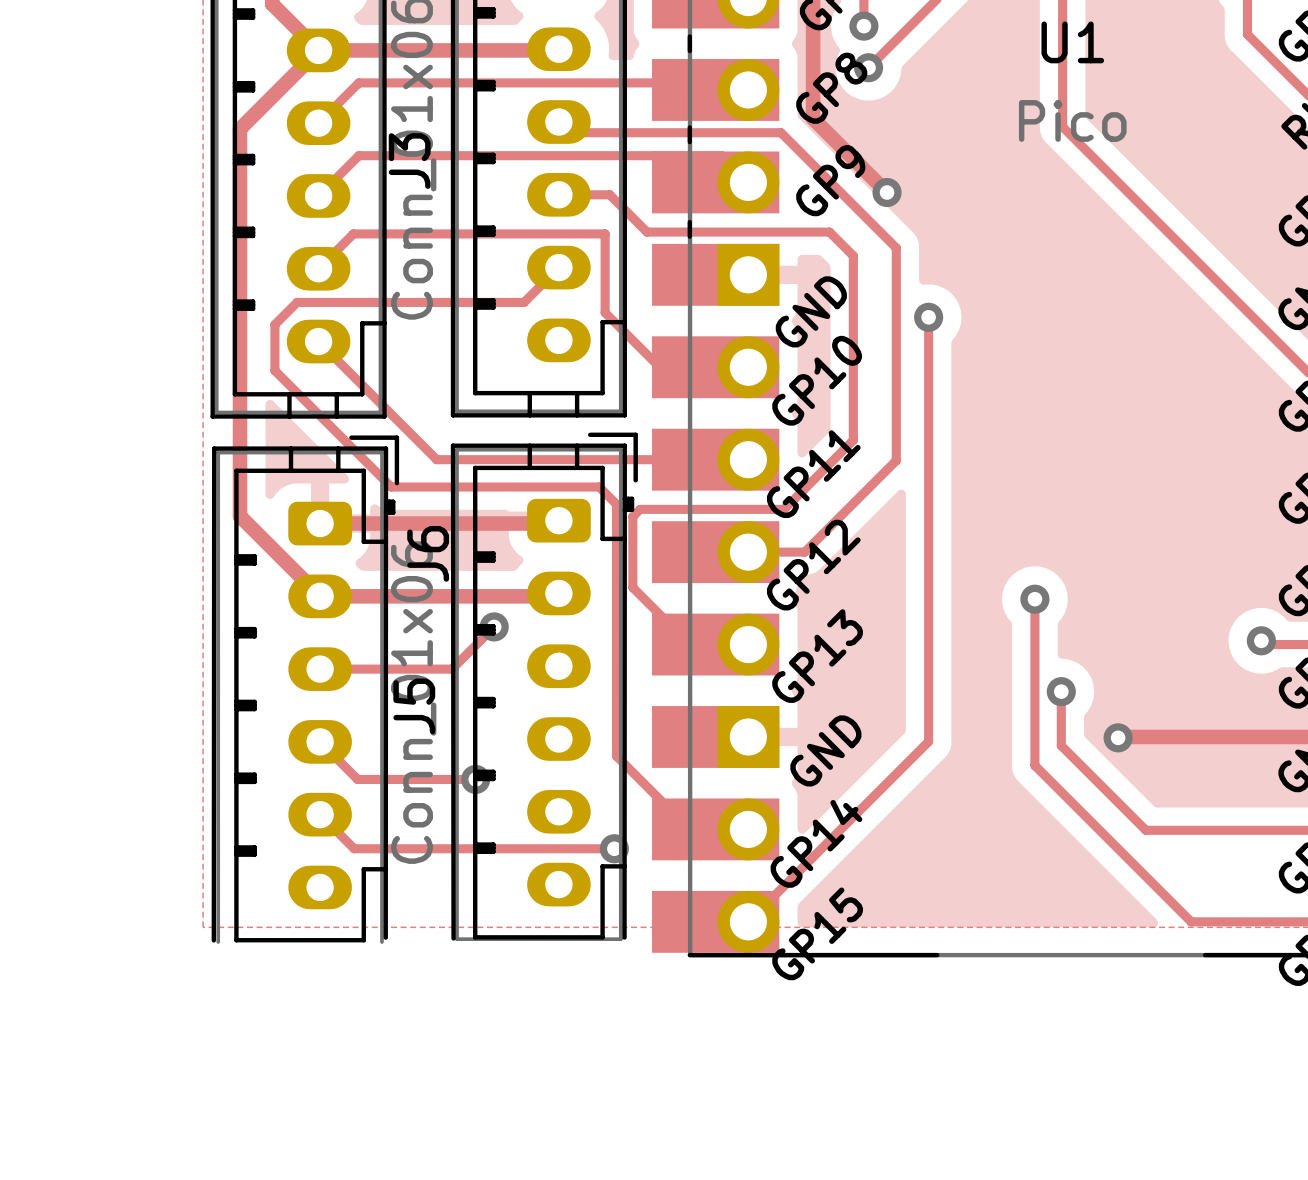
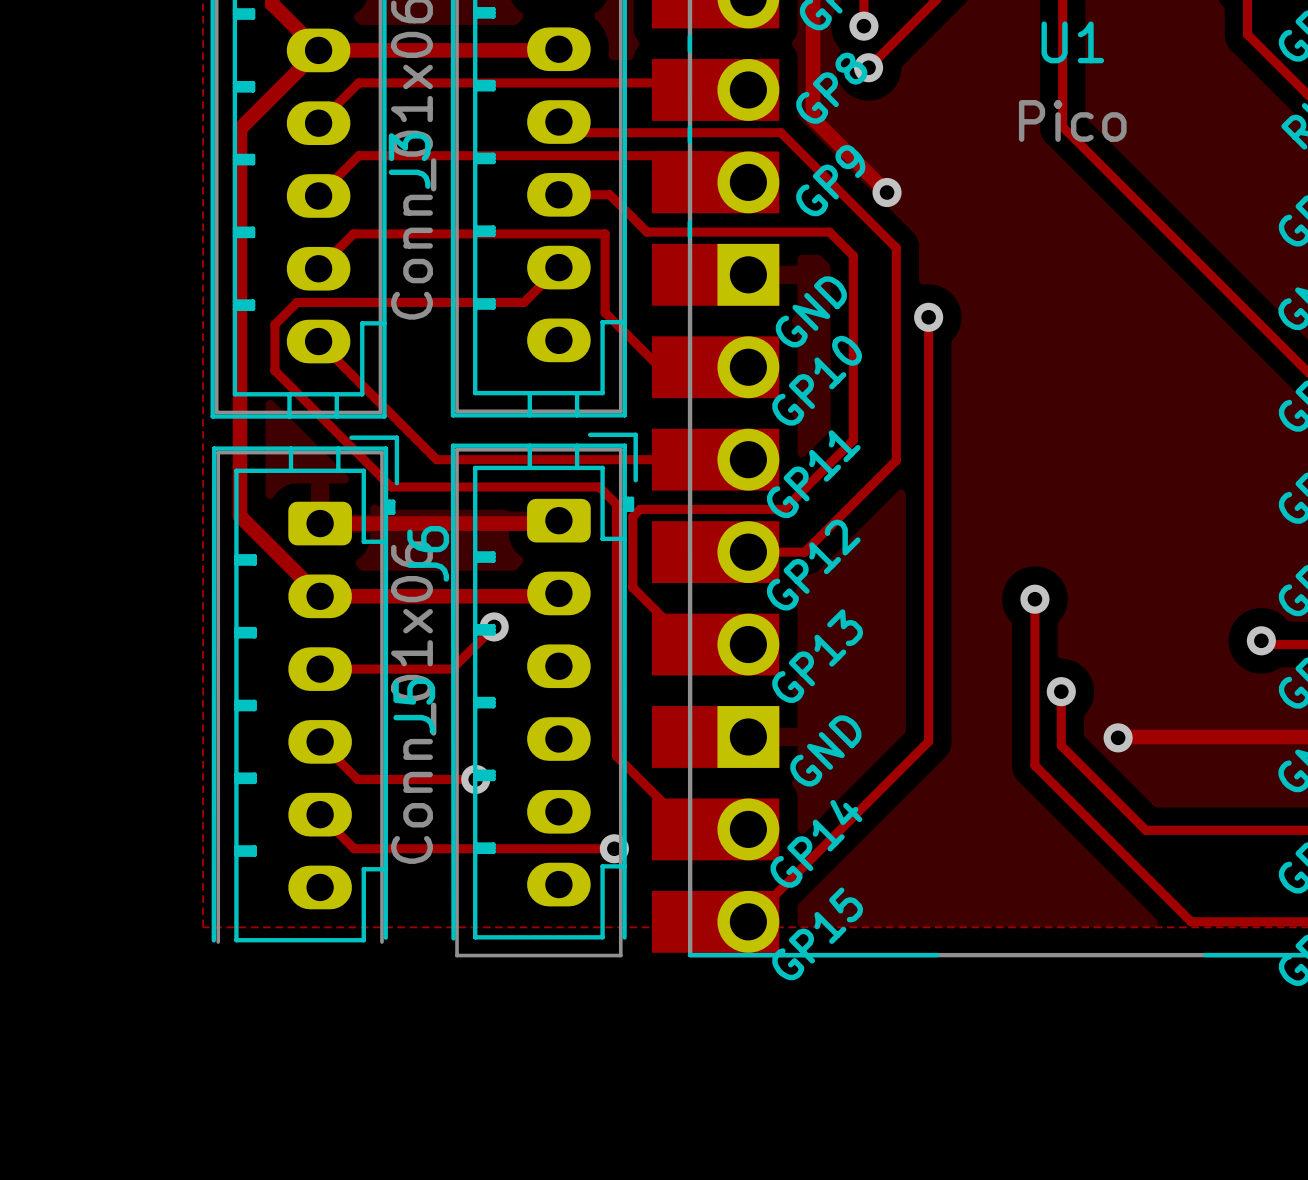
J6 footprint: [450, 432, 638, 941] -> [450, 432, 638, 958]

